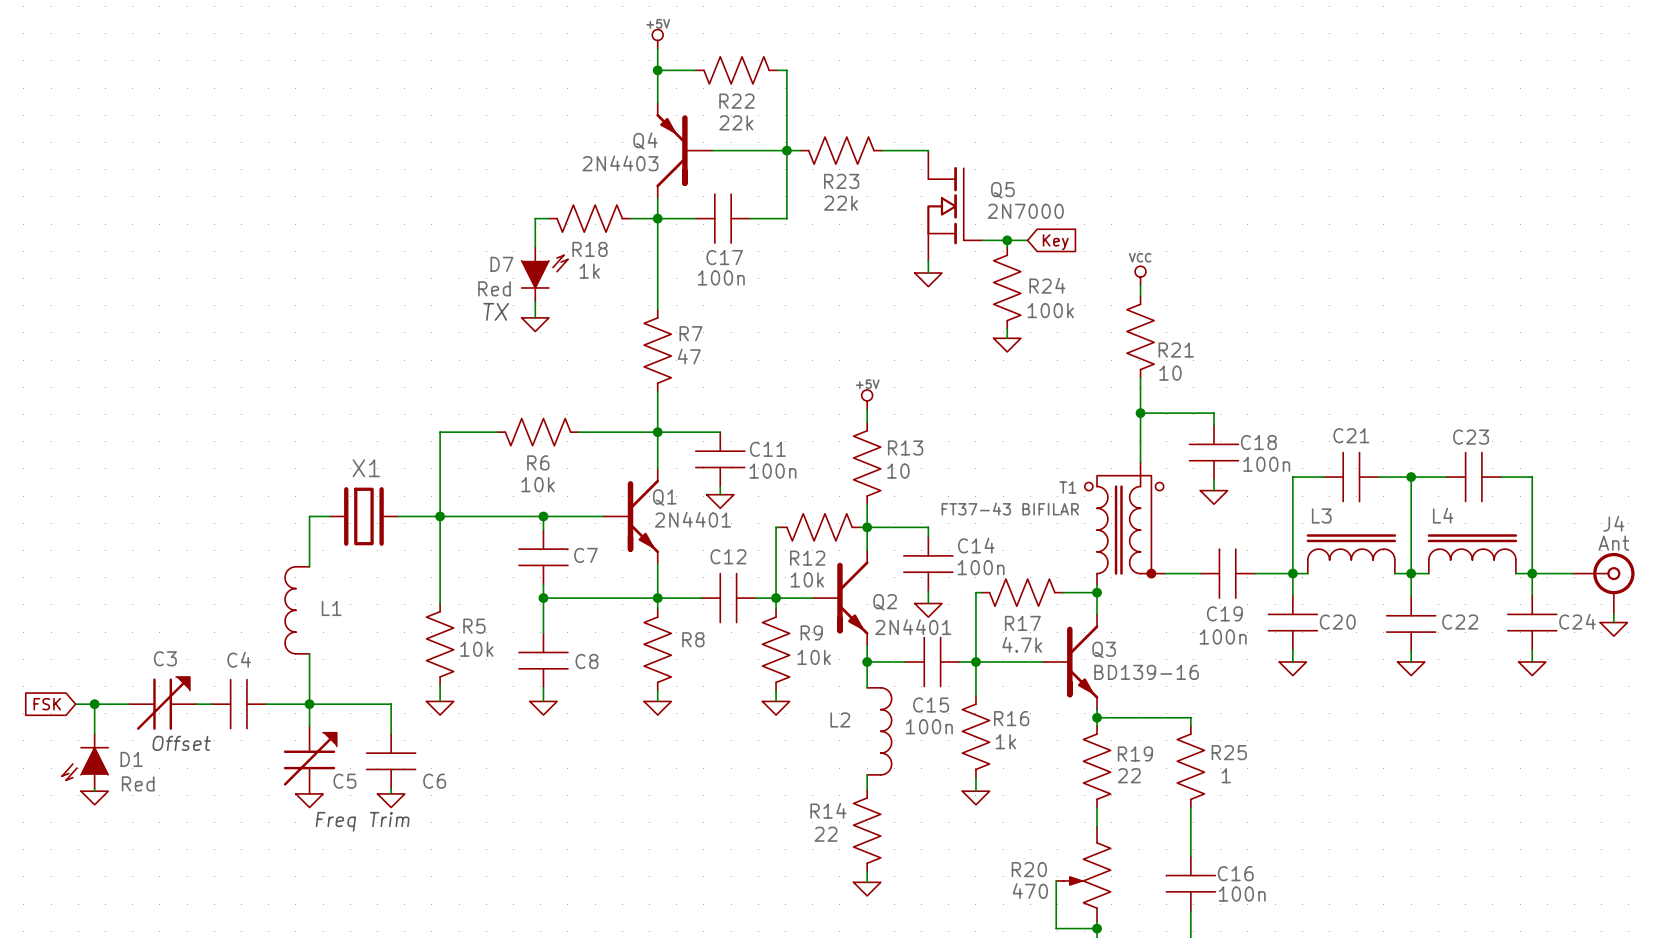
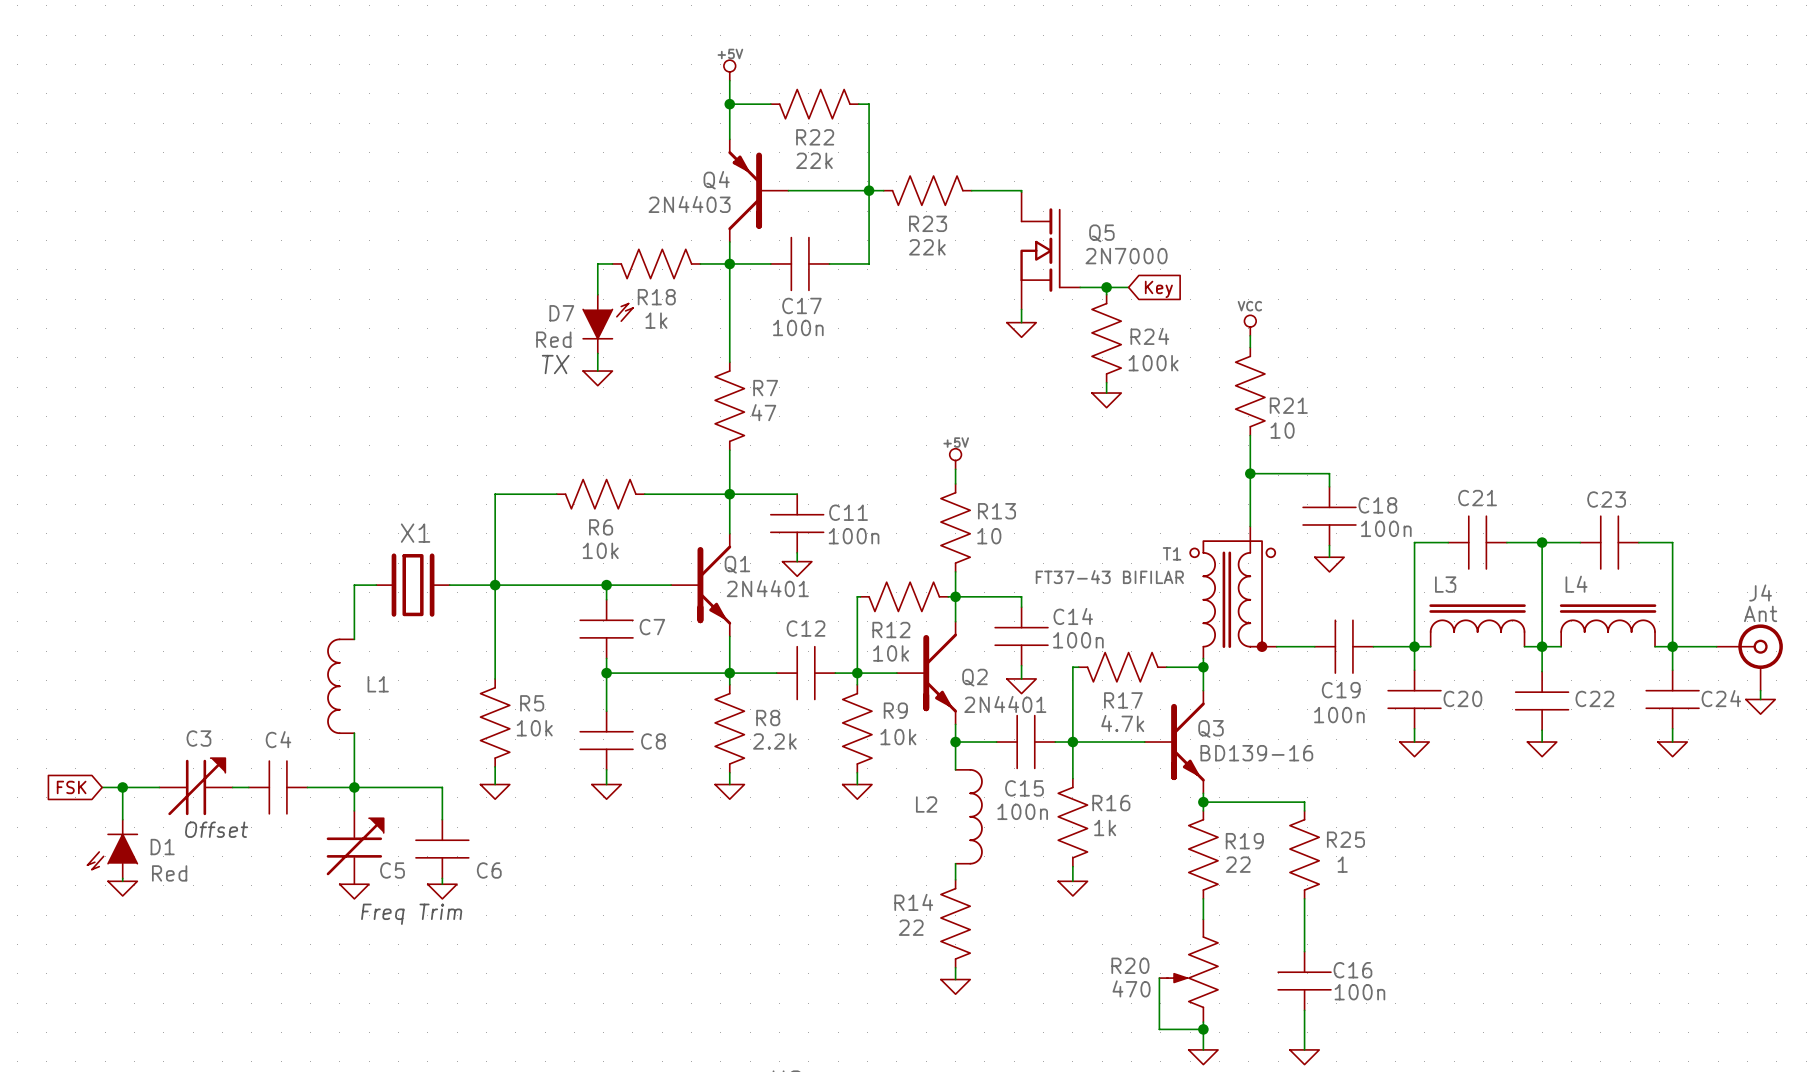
R8 value: none -> 2.2k (774, 741)

